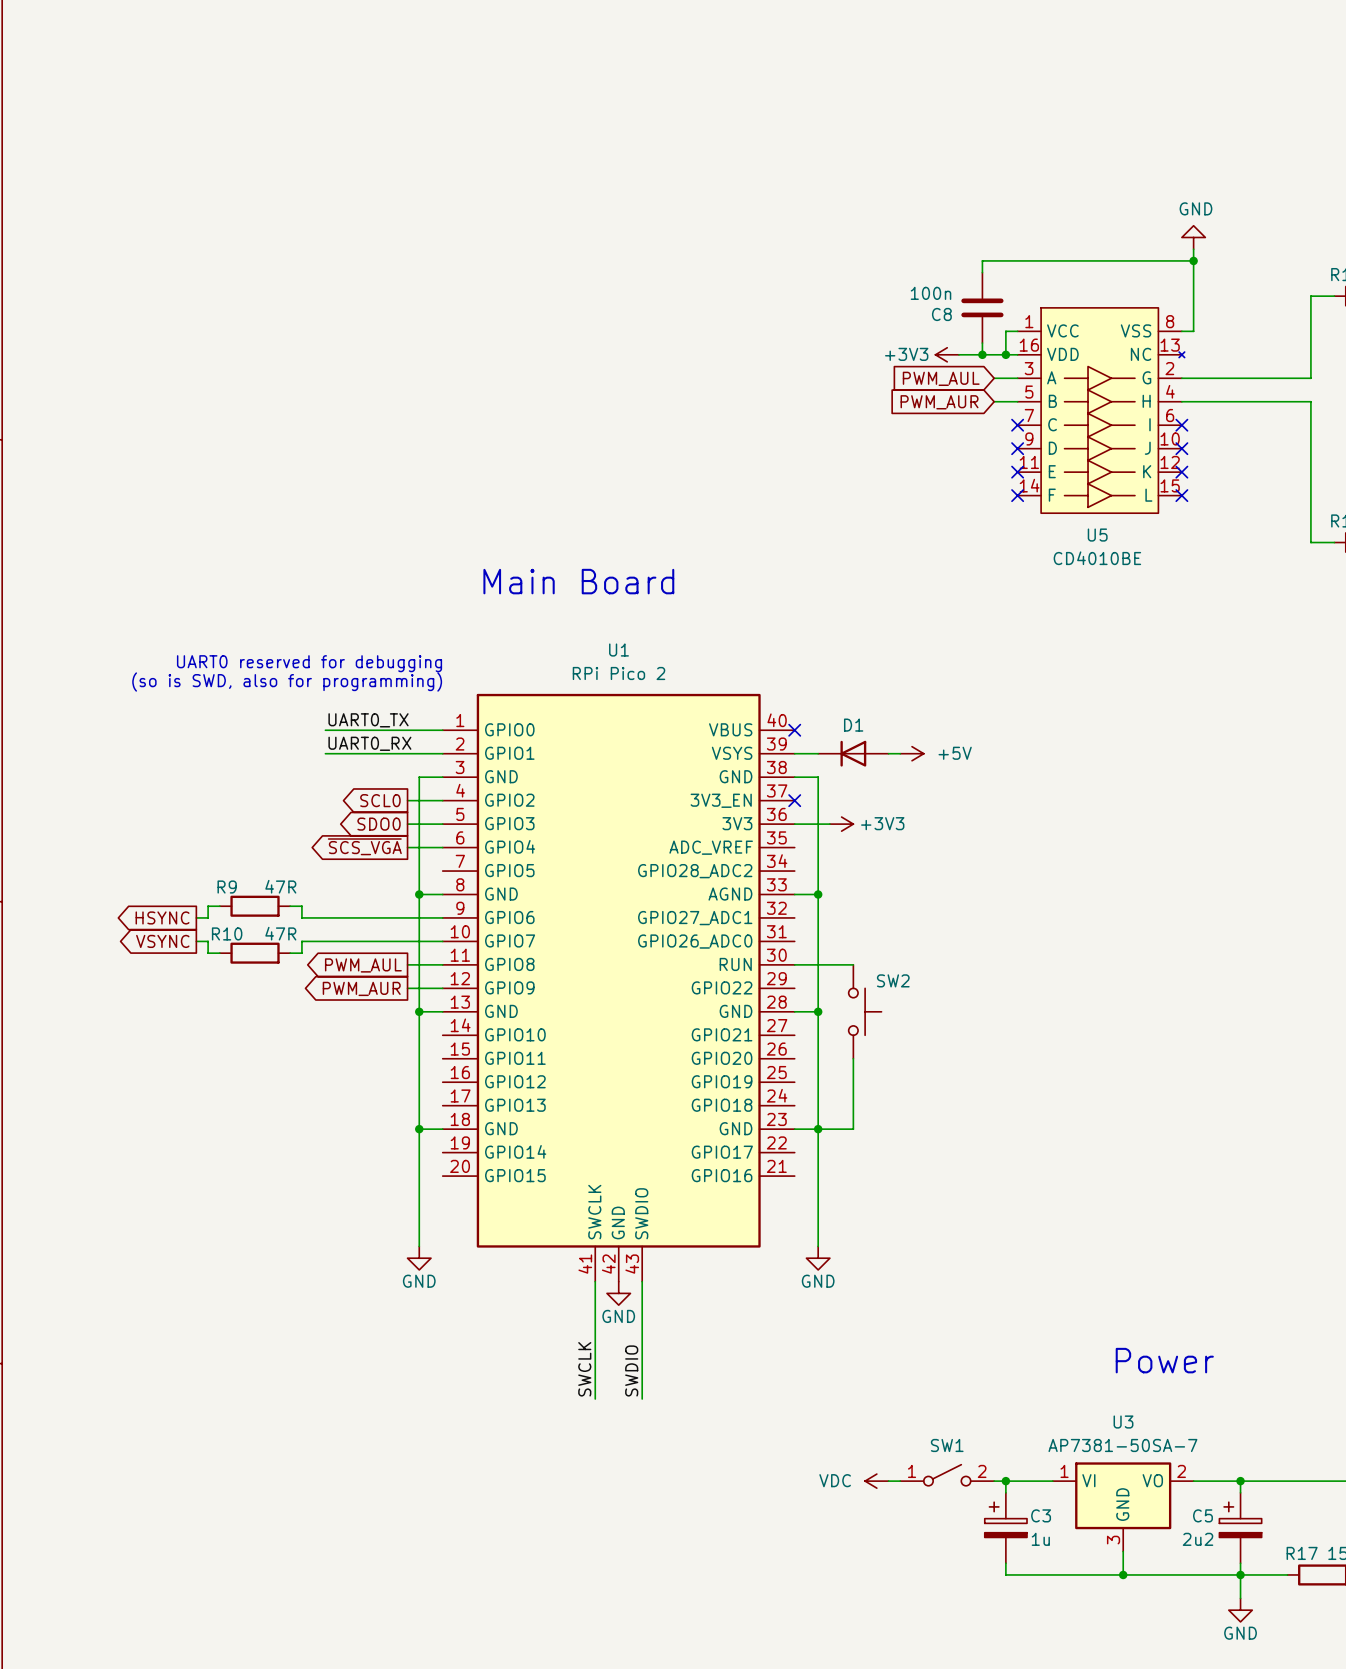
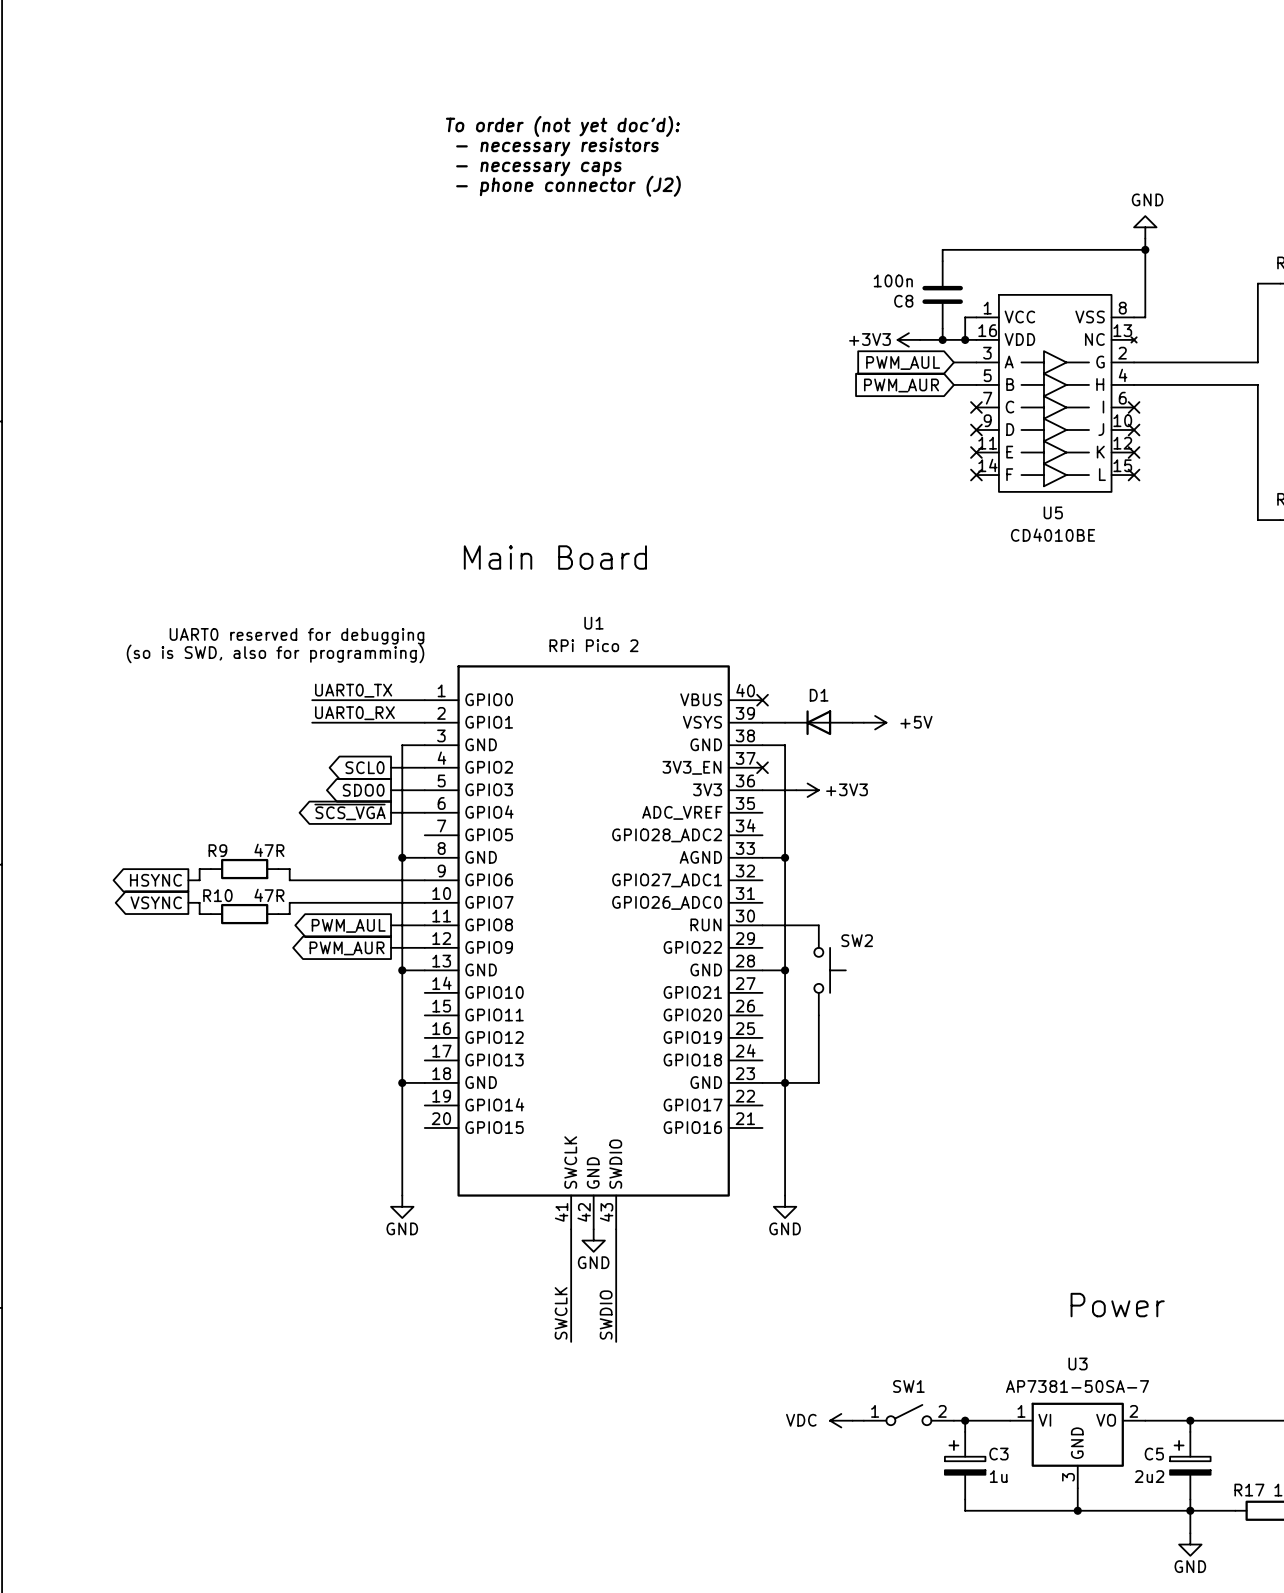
text: none -> To order (not yet doc'd): (562, 126)
text: none -> - necessary resistors (557, 146)
text: none -> - necessary caps (538, 168)
text: none -> - phone connector (J2) (568, 186)

